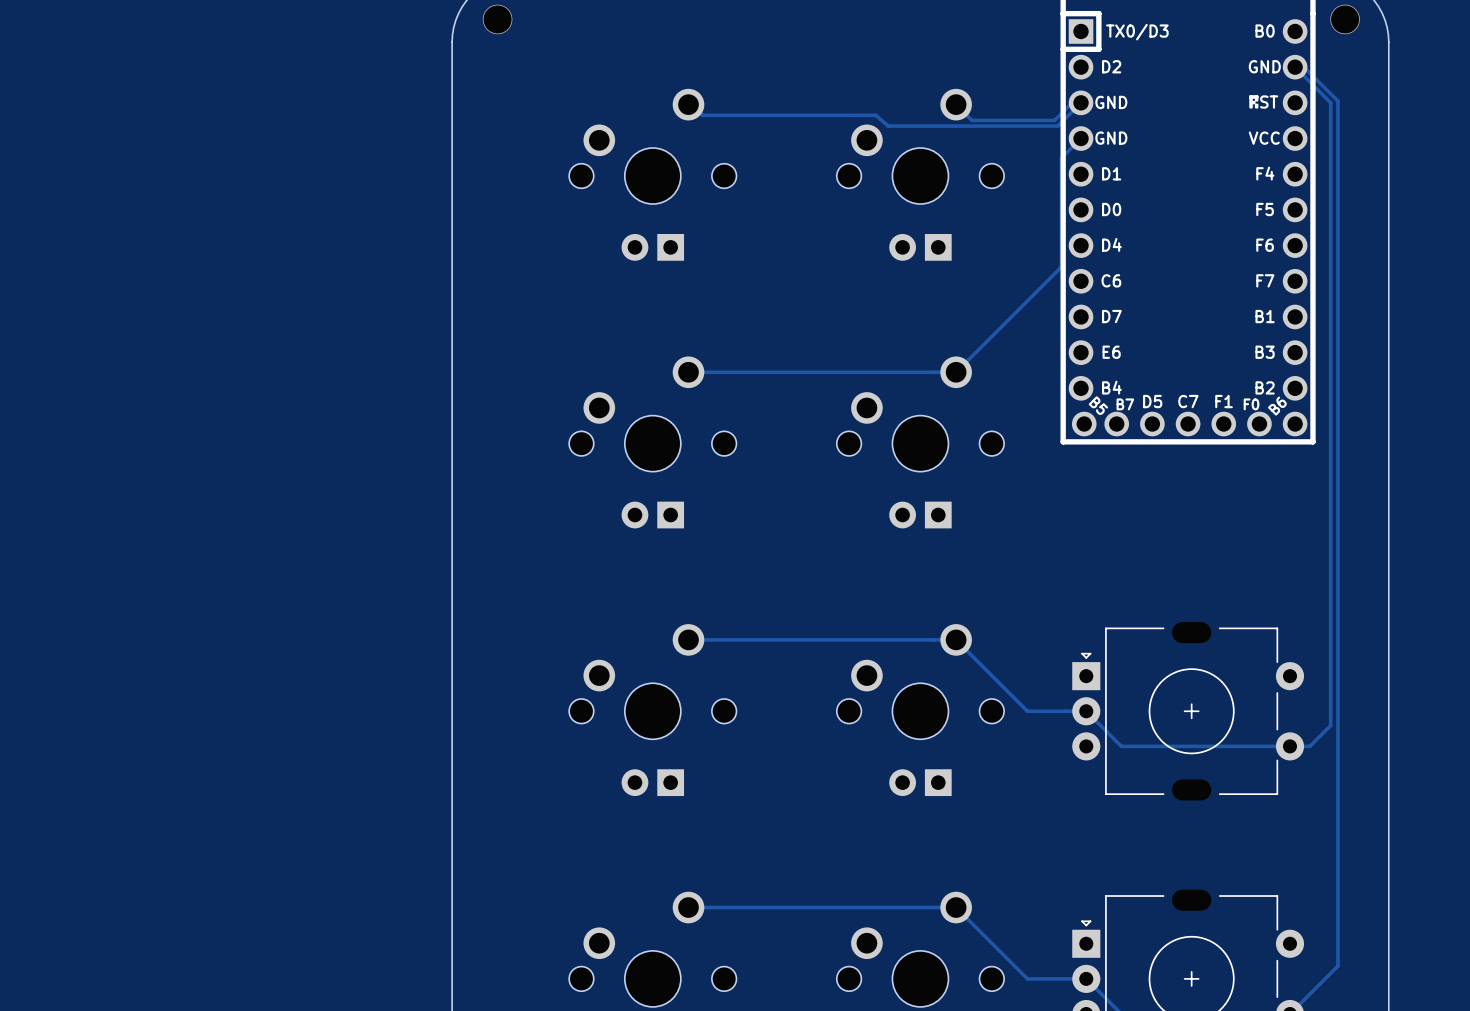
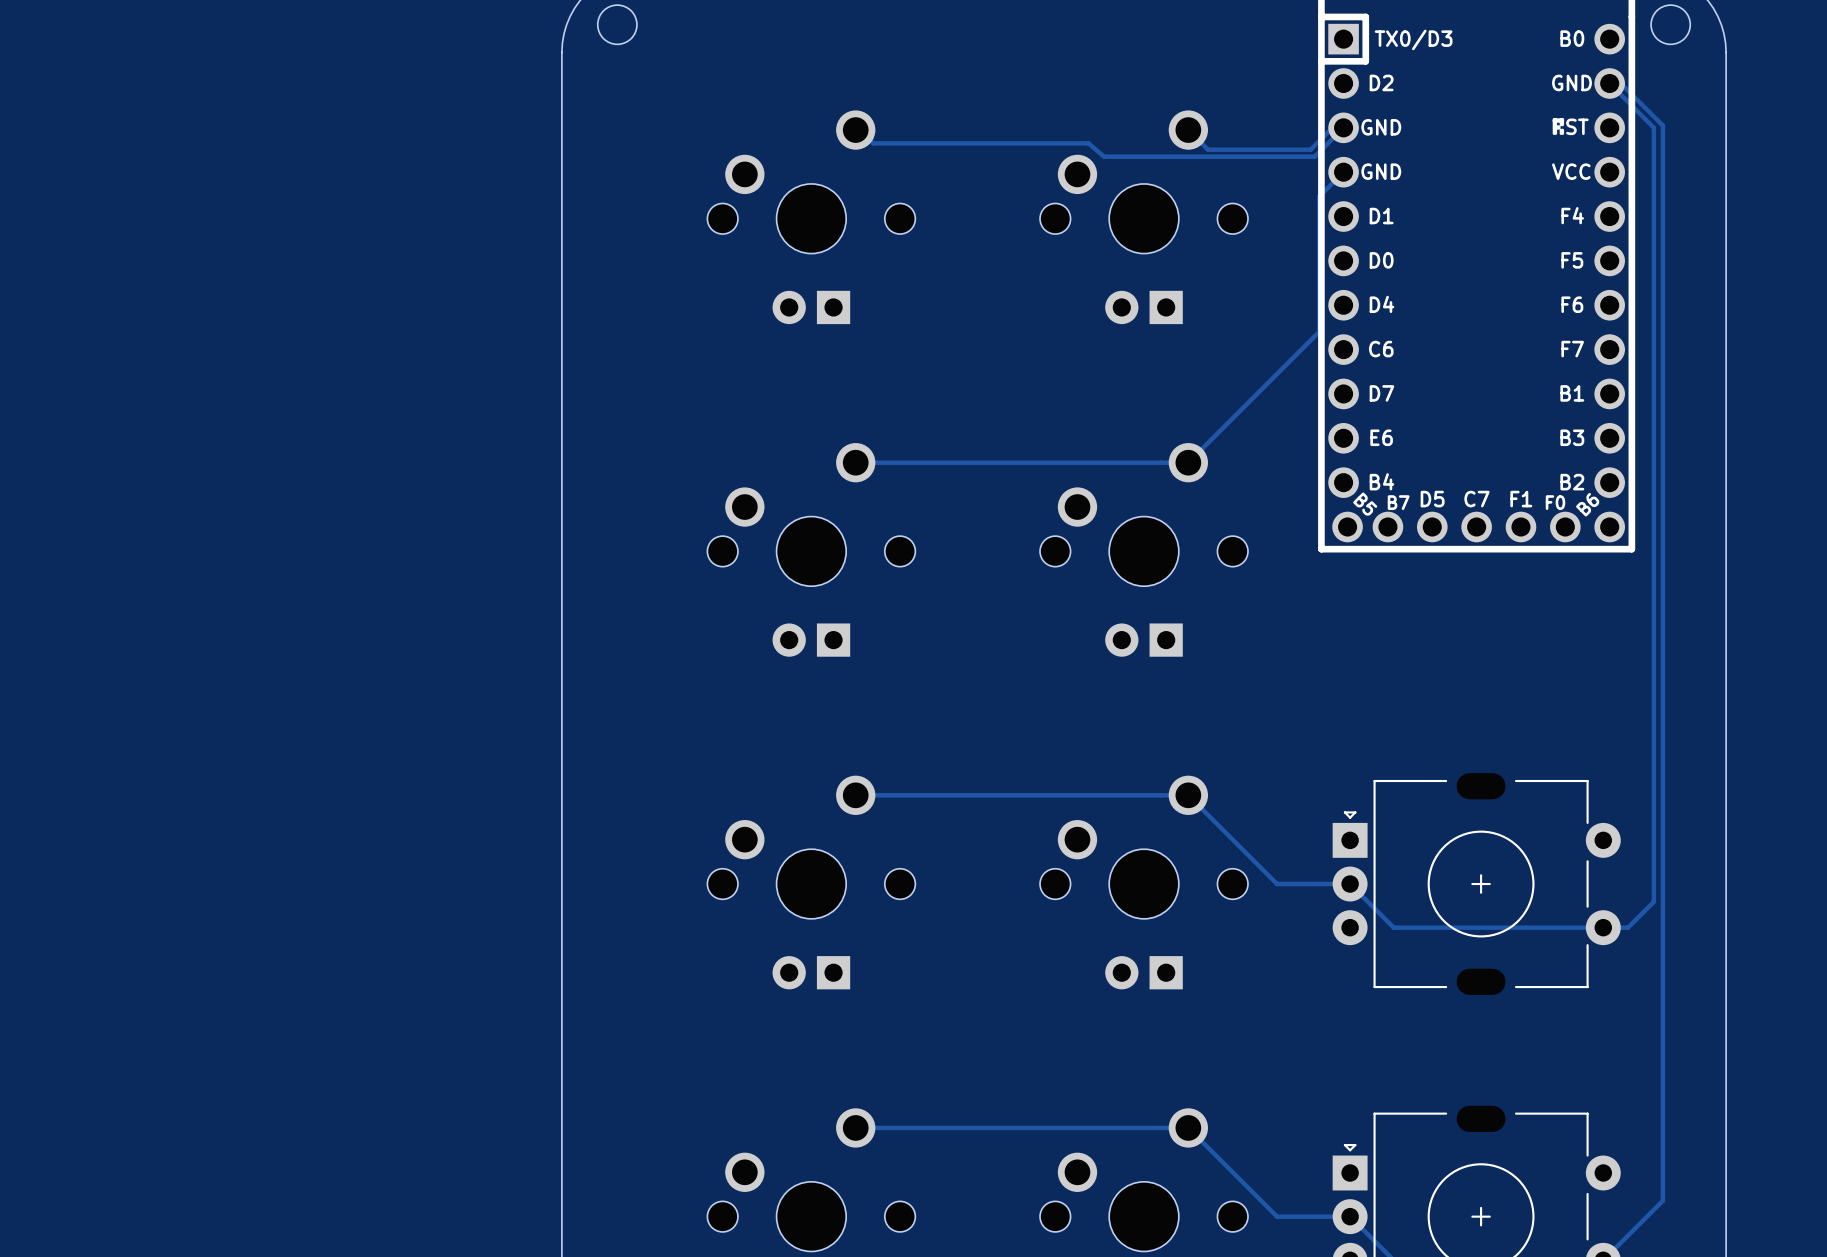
round board edge: none -> [597, 4, 638, 45]
round board edge: none -> [1650, 4, 1691, 45]
via: (497, 19) -> none
via: (1345, 19) -> none

